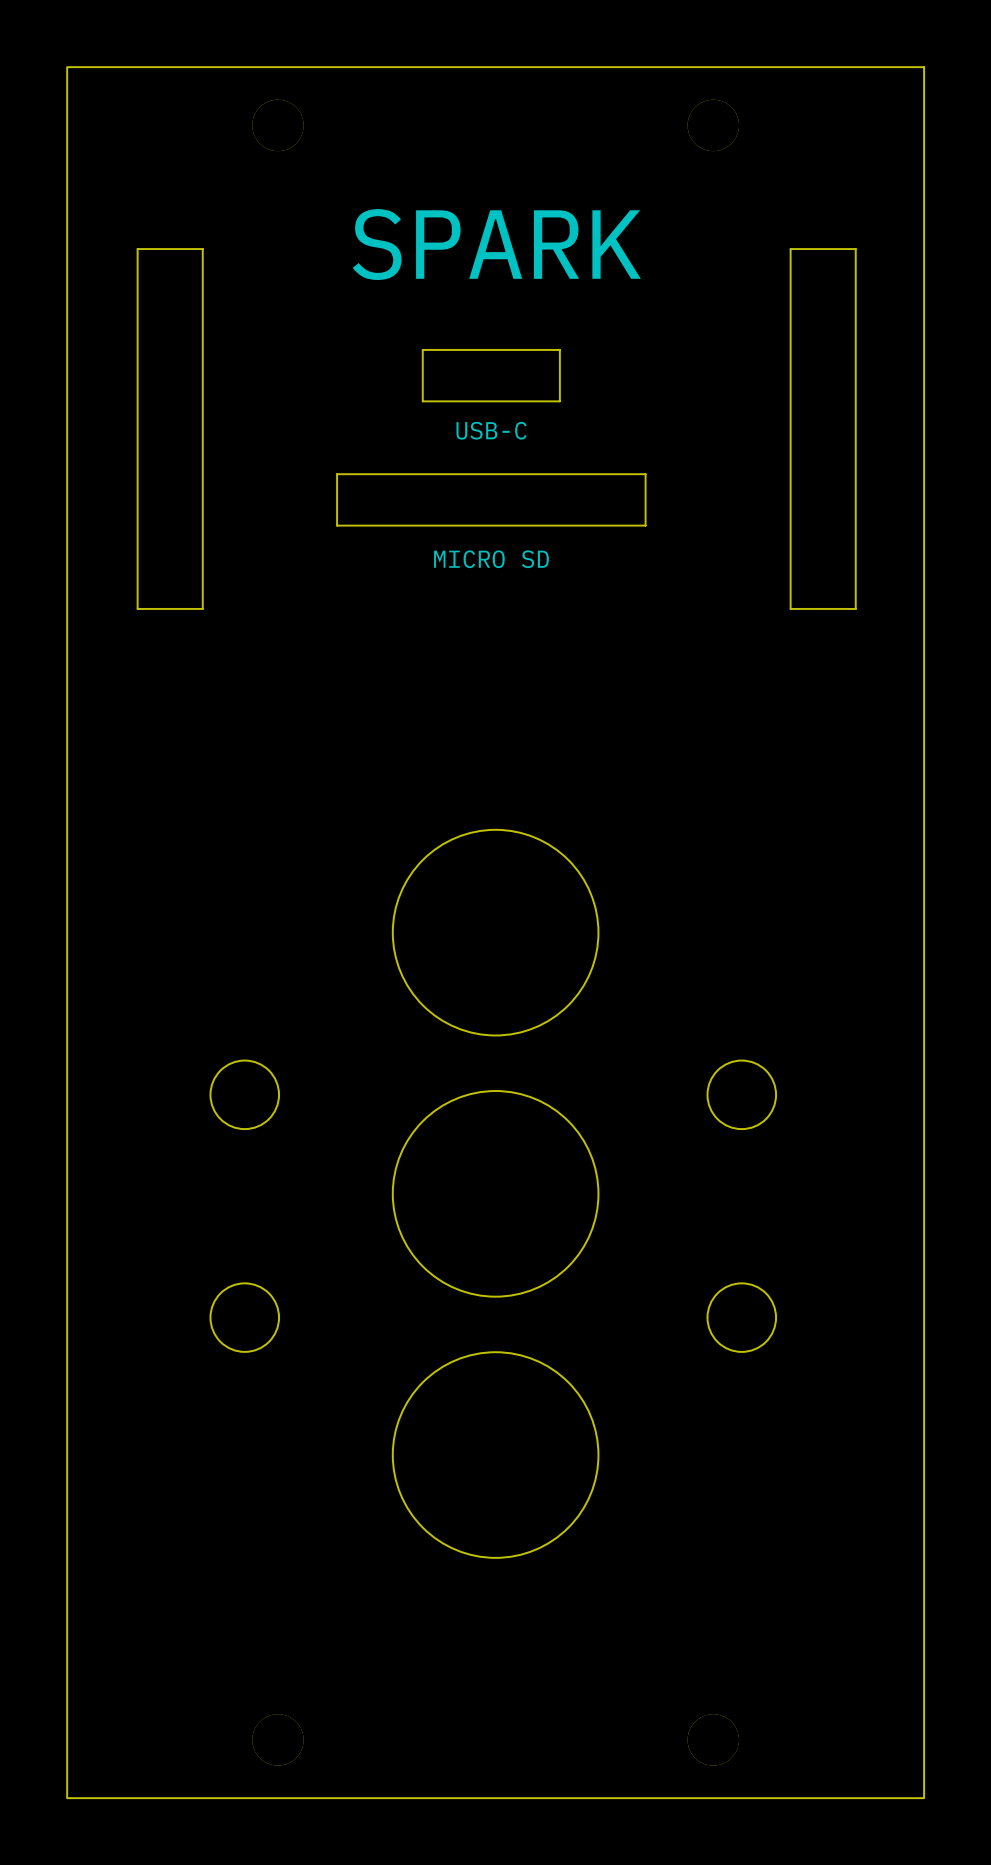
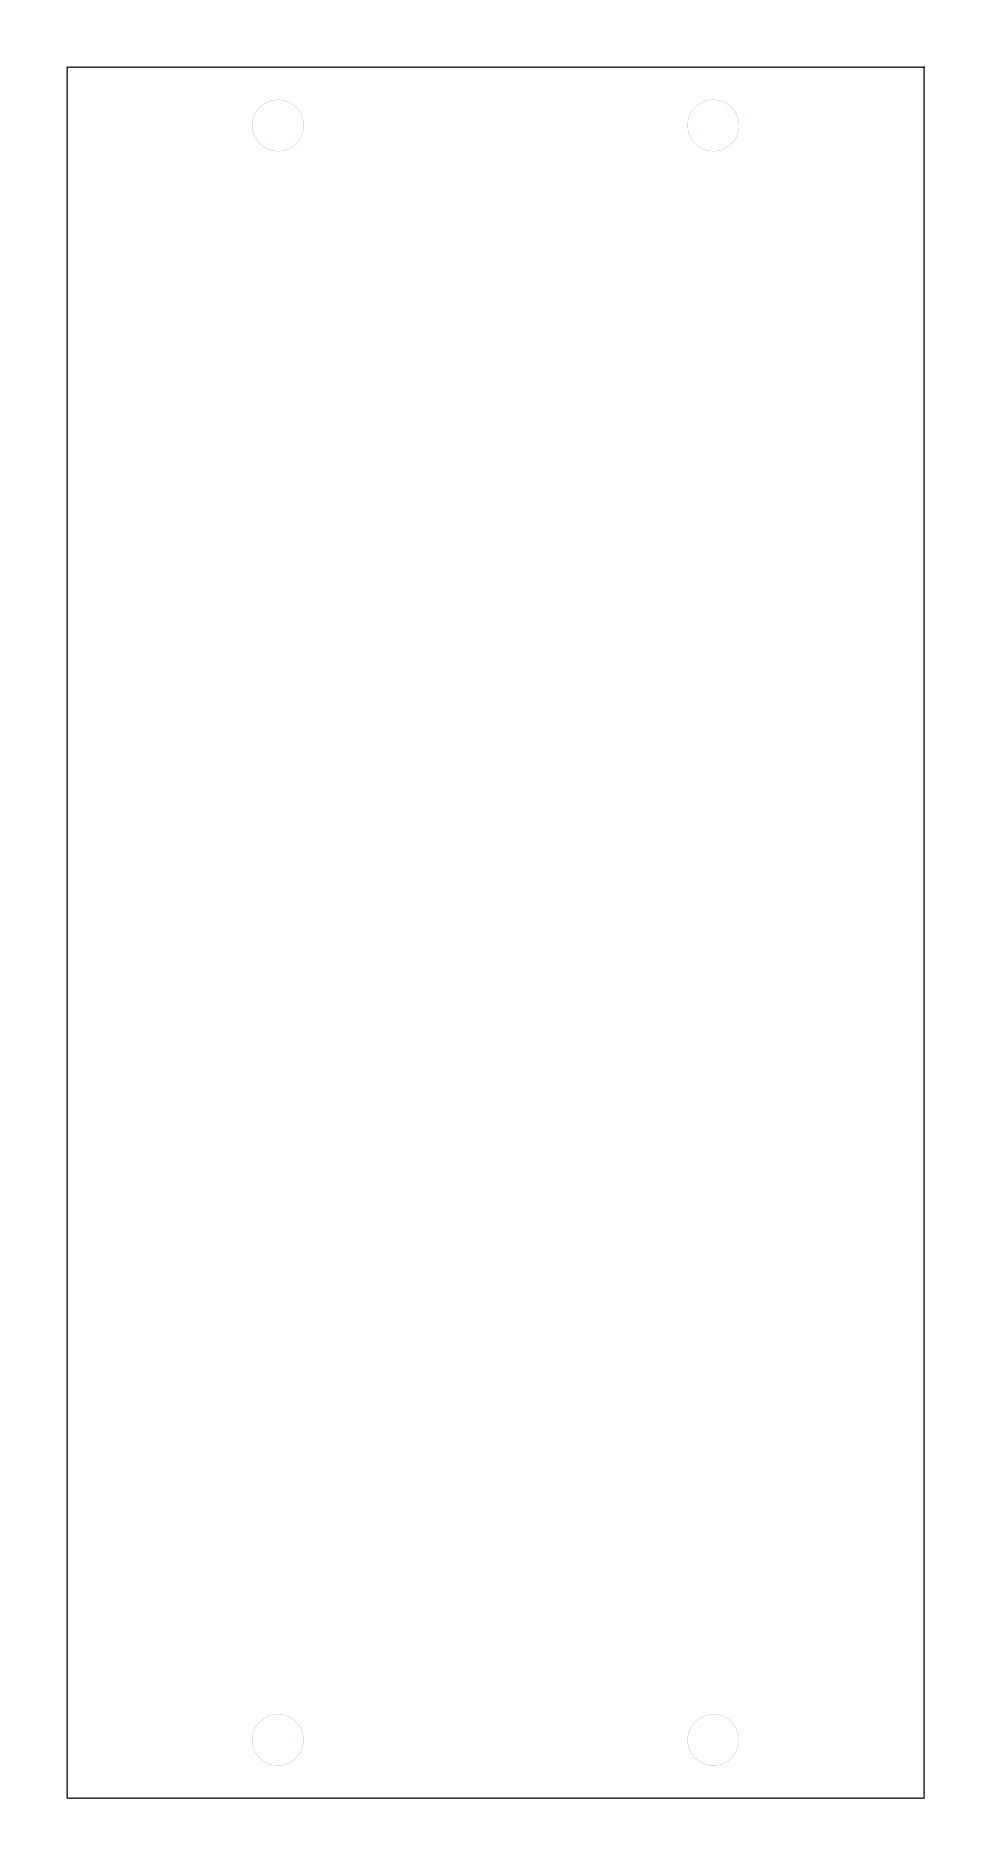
text: SPARK (496, 244) -> none
board edge: (202, 249) (137, 249) (137, 608) (202, 608) (202, 249) -> none
board edge: (855, 249) (790, 249) (790, 608) (855, 608) (855, 249) -> none
board edge: (559, 349) (422, 349) (422, 401) (559, 401) (559, 349) -> none
text: USB-C (491, 430) -> none
board edge: (645, 474) (337, 474) (337, 525) (645, 525) (645, 474) -> none
text: MICRO SD (491, 559) -> none
round board edge: [392, 829, 599, 1036] -> none
round board edge: [210, 1060, 280, 1130] -> none
round board edge: [707, 1060, 777, 1130] -> none
round board edge: [392, 1090, 599, 1298] -> none
round board edge: [210, 1283, 280, 1353] -> none
round board edge: [707, 1283, 777, 1353] -> none
round board edge: [392, 1351, 599, 1559] -> none

